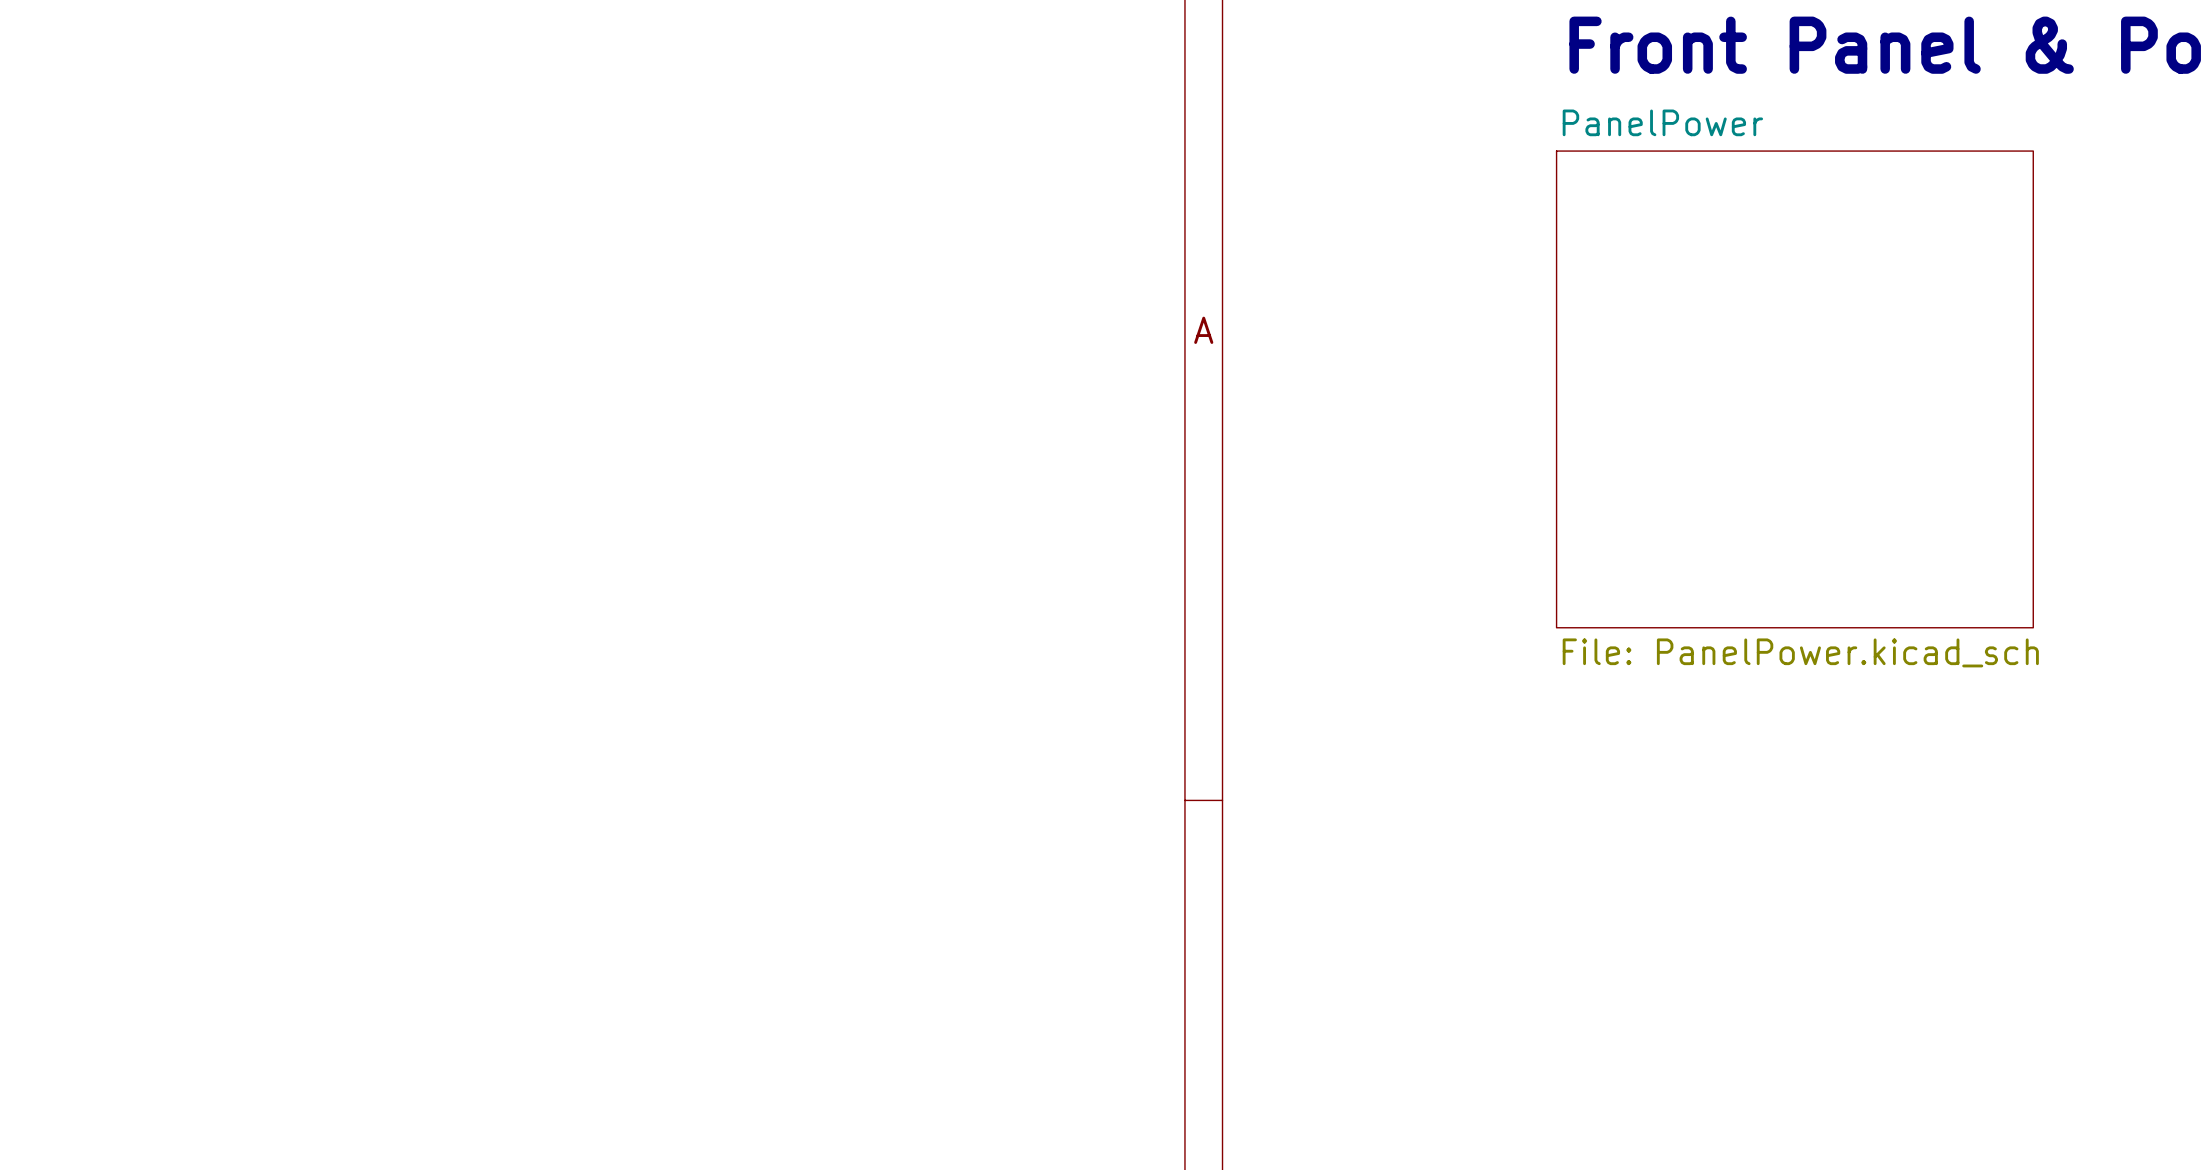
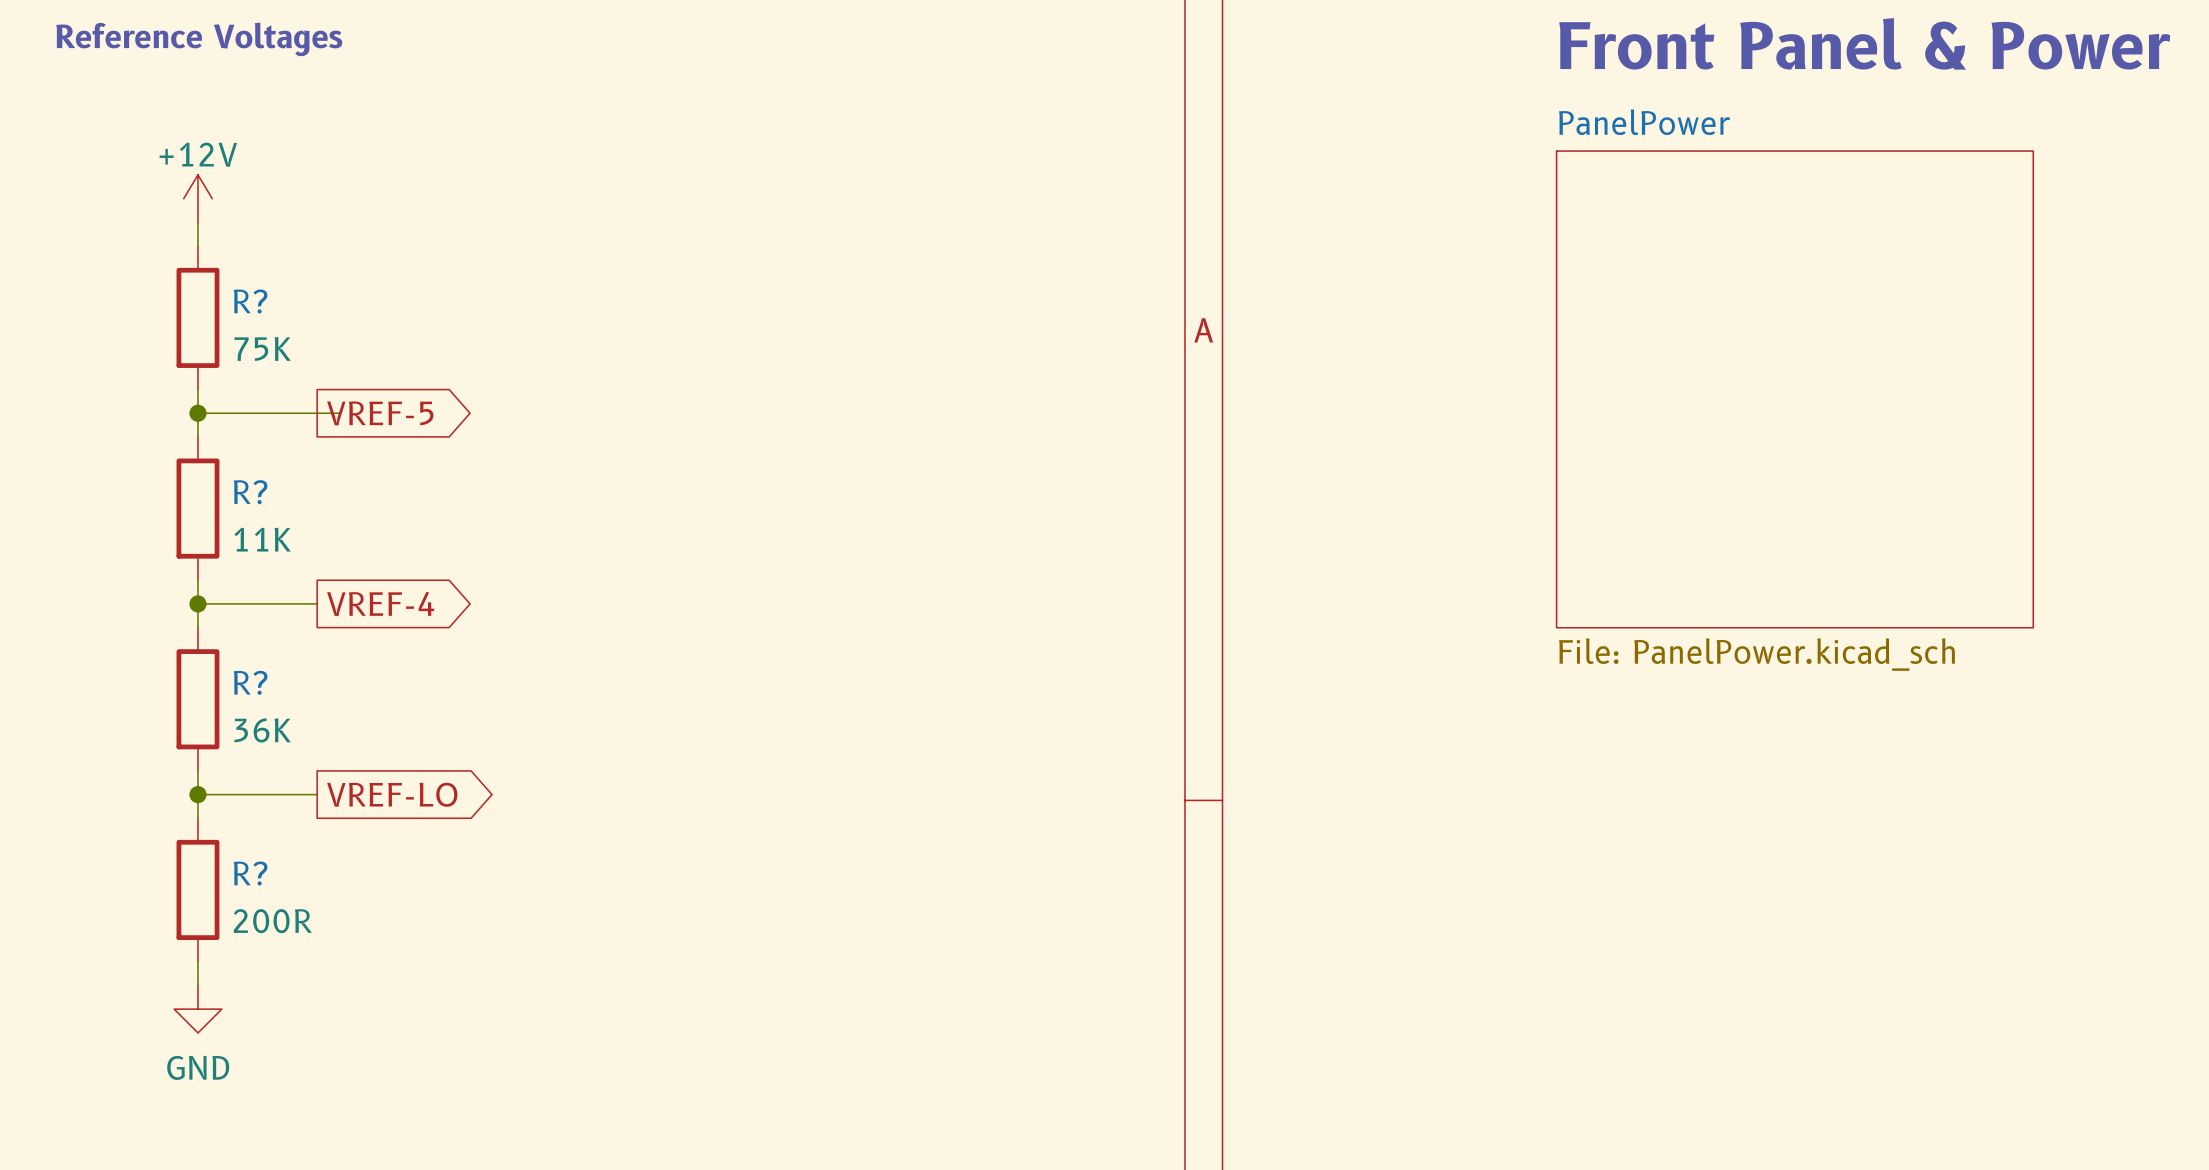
text: none -> Reference Voltages (199, 39)
power symbol: none -> +12V (197, 198)
wire: none -> (197, 222) (197, 246)
R?: none -> 75K (197, 317)
wire: none -> (197, 389) (197, 437)
wire: none -> (197, 413) (340, 413)
junction: none -> (197, 413)
global label: none -> VREF-5 (380, 413)
R?: none -> 11K (197, 508)
wire: none -> (197, 580) (197, 627)
wire: none -> (197, 603) (317, 603)
junction: none -> (197, 603)
global label: none -> VREF-4 (380, 604)
R?: none -> 36K (197, 699)
wire: none -> (197, 770) (197, 818)
wire: none -> (197, 794) (317, 794)
junction: none -> (197, 794)
global label: none -> VREF-LO (392, 794)
R?: none -> 200R (197, 889)
wire: none -> (197, 961) (197, 985)
power symbol: none -> GND (197, 1009)

